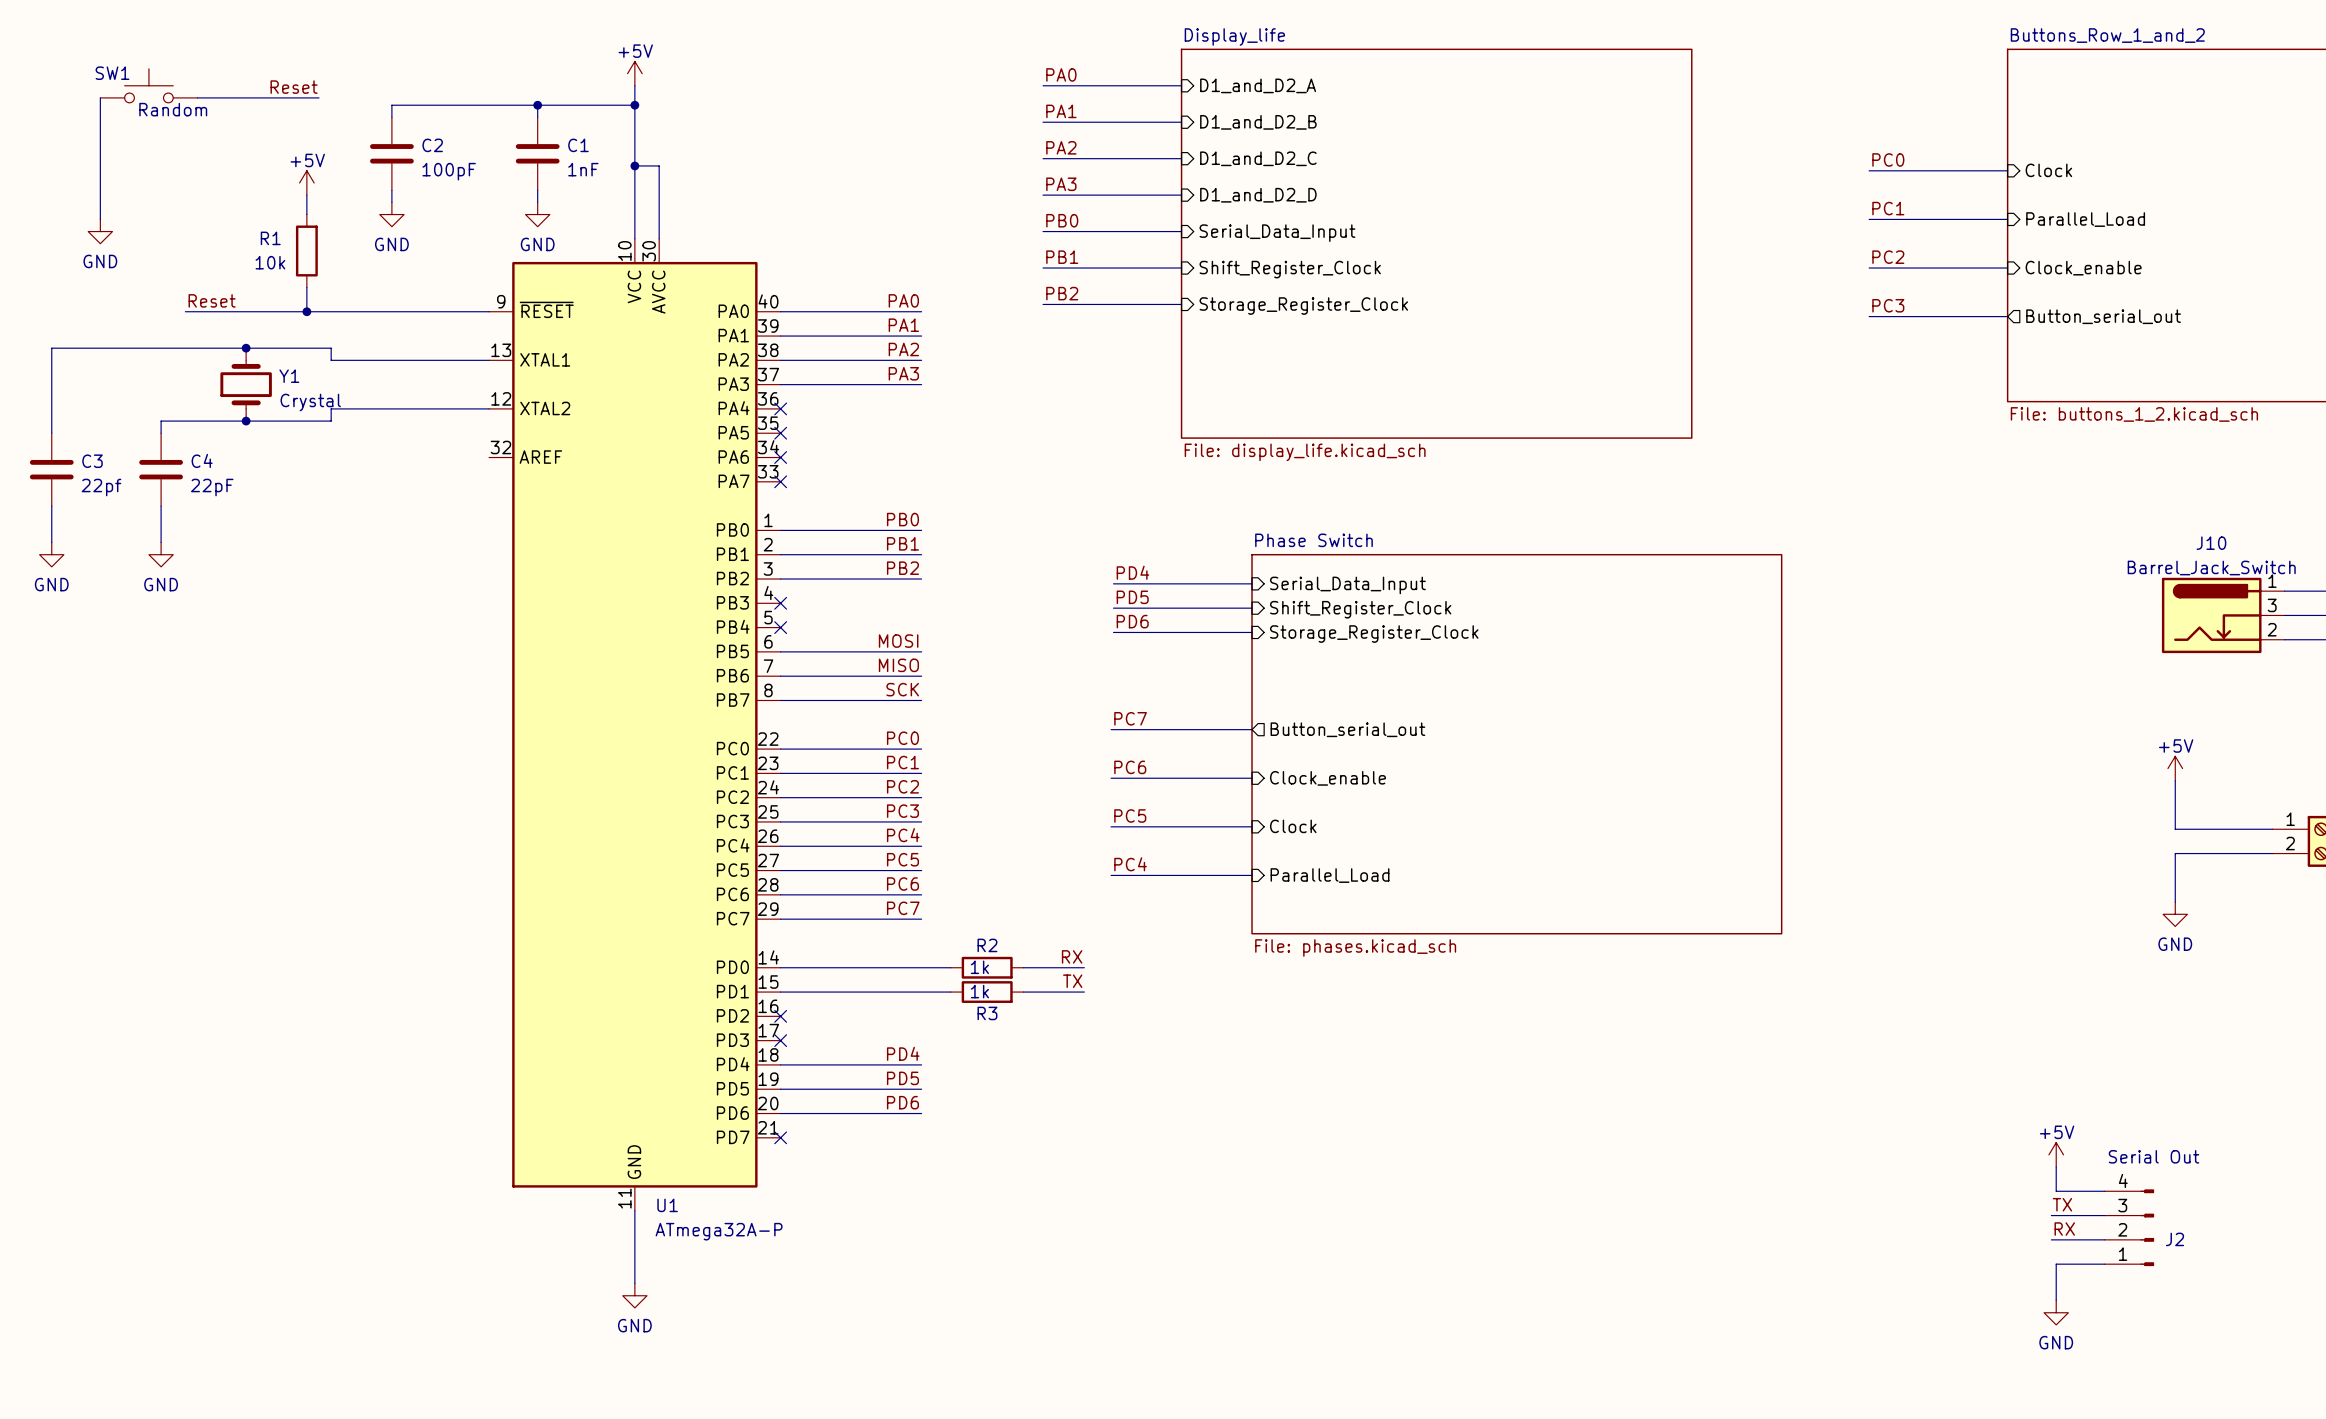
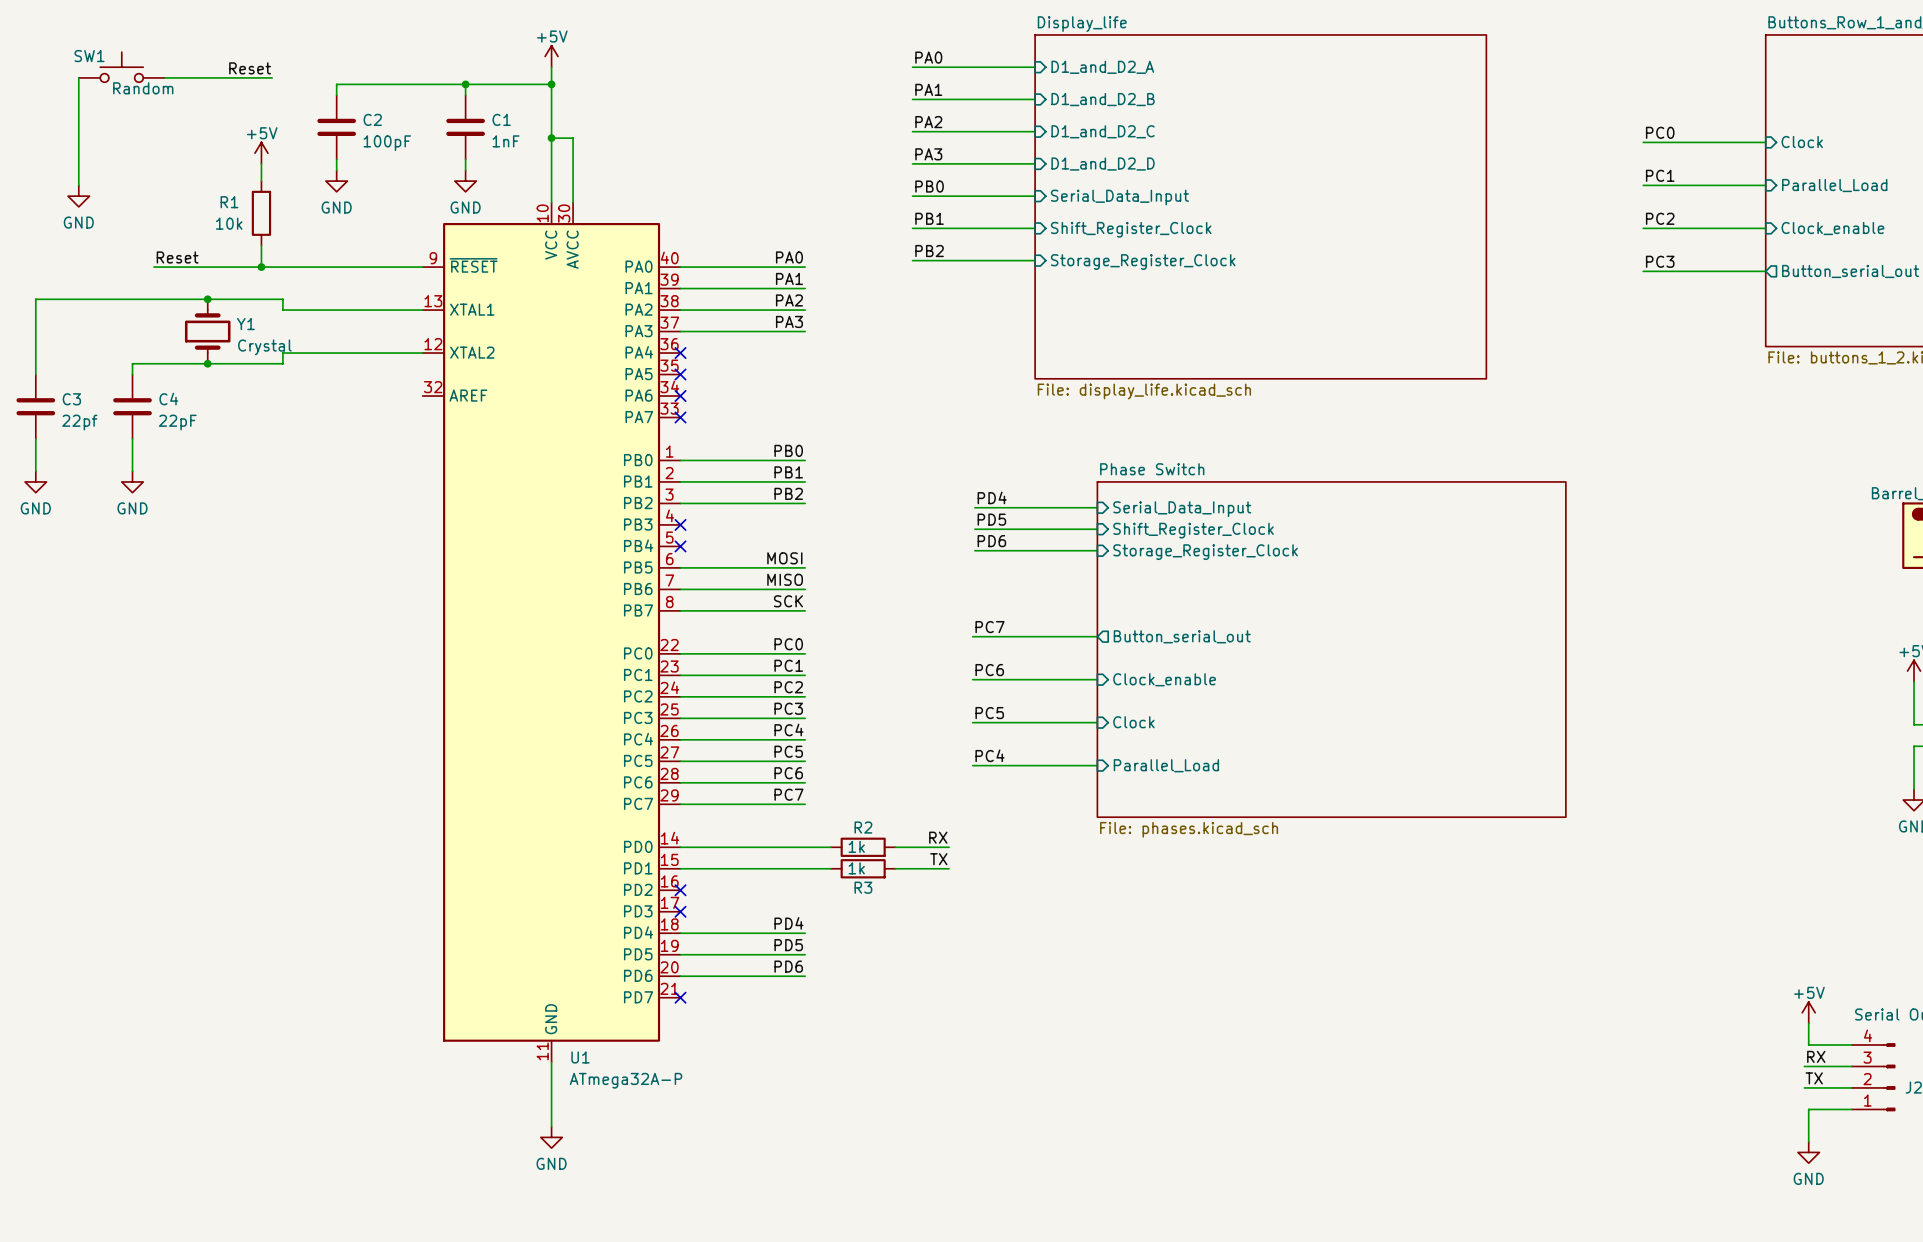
label: TX (2062, 1204) -> RX (1816, 1056)
label: RX (2064, 1229) -> TX (1814, 1078)

